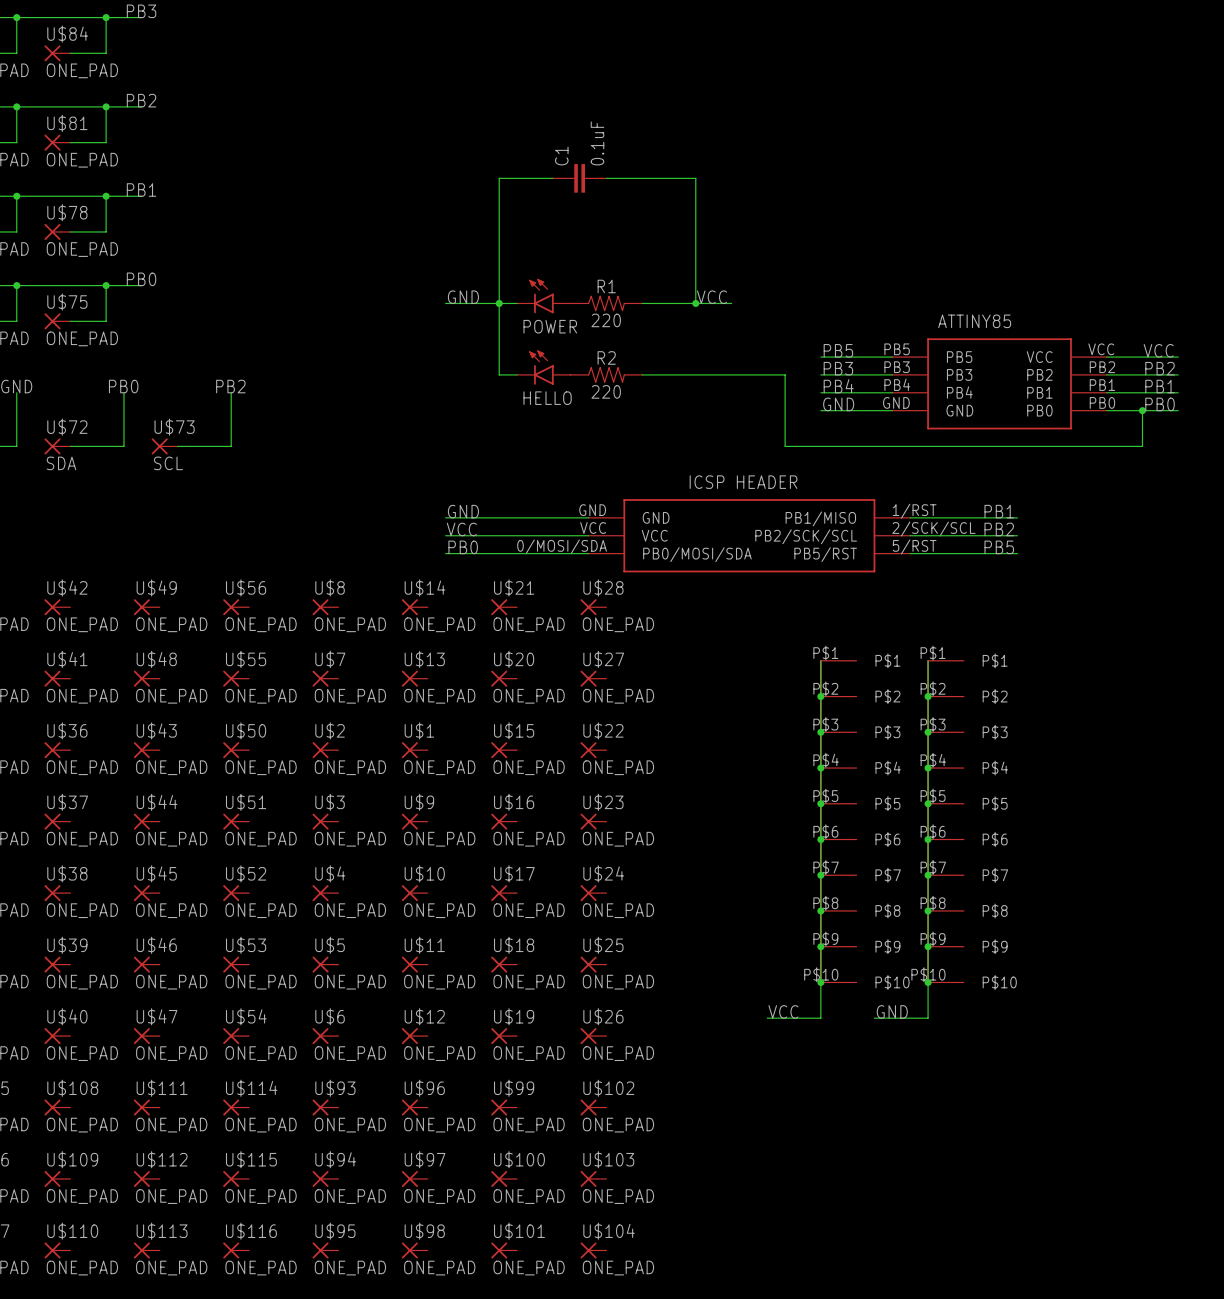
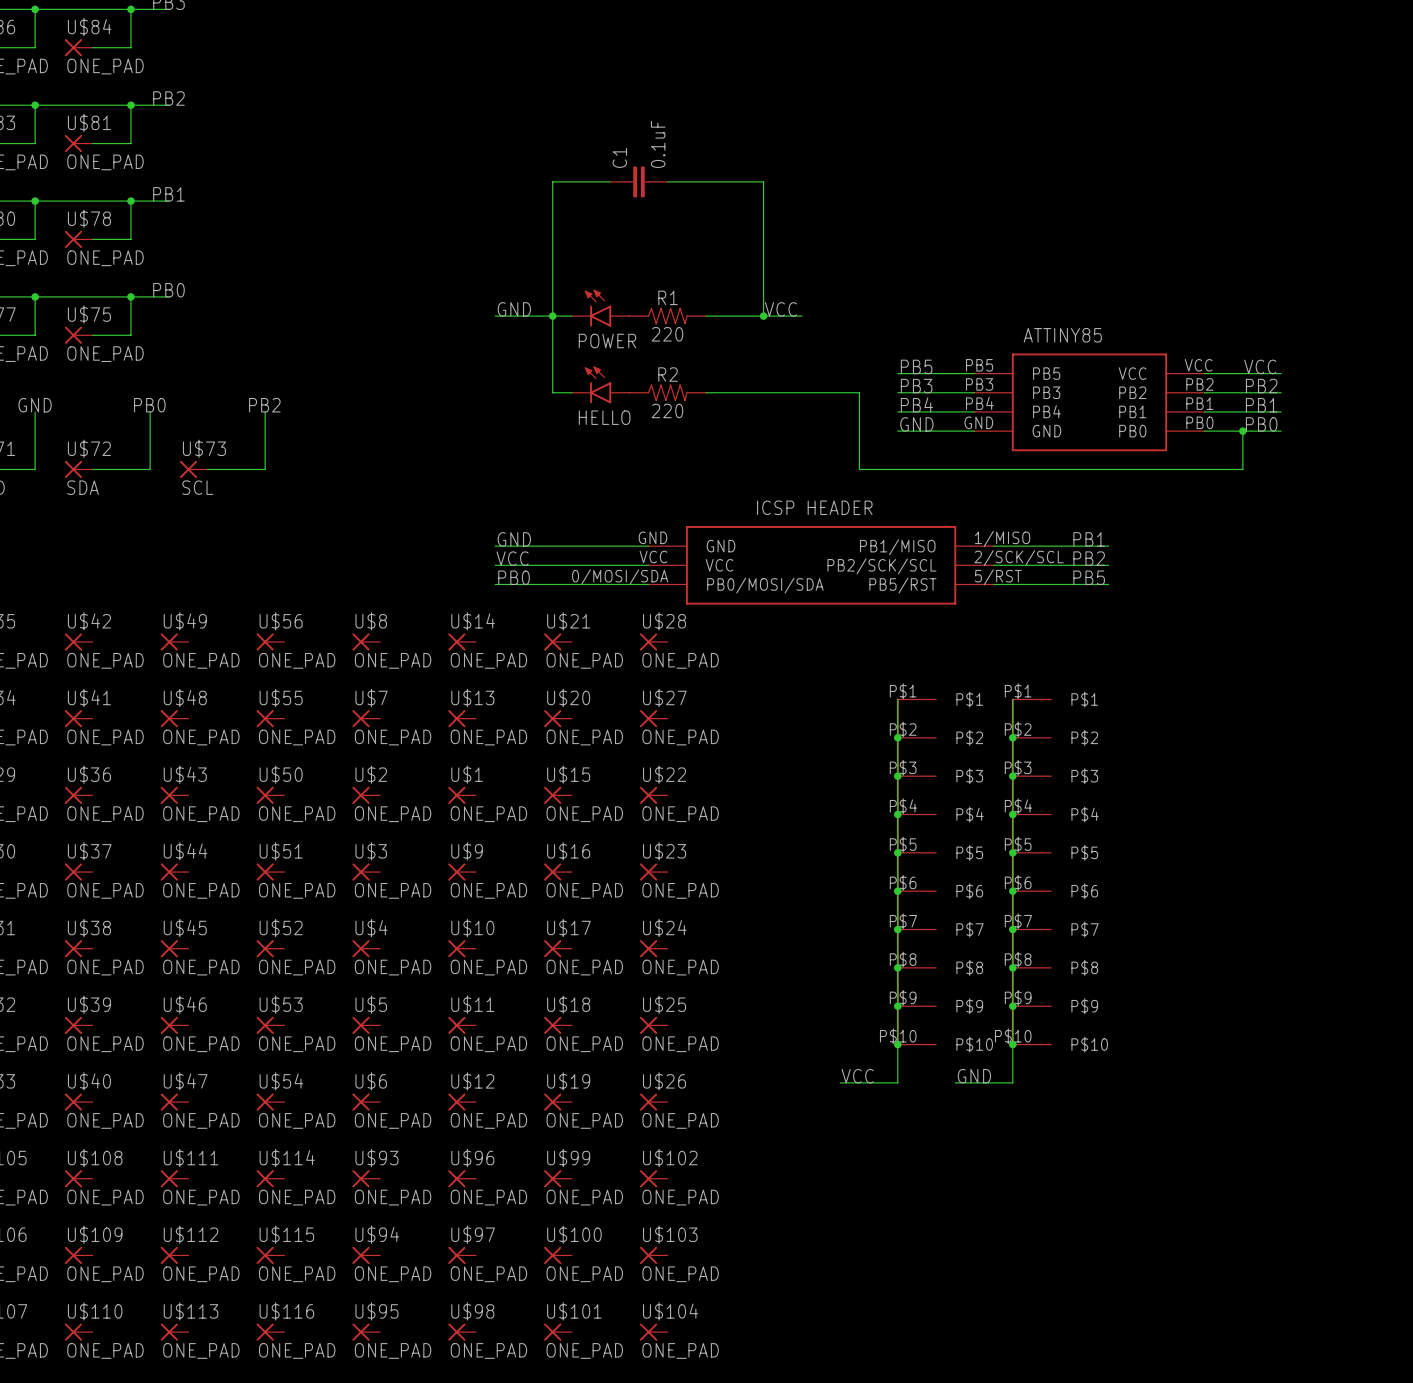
part pin number: 1/RST (914, 511) -> 1/MISO (1002, 538)

